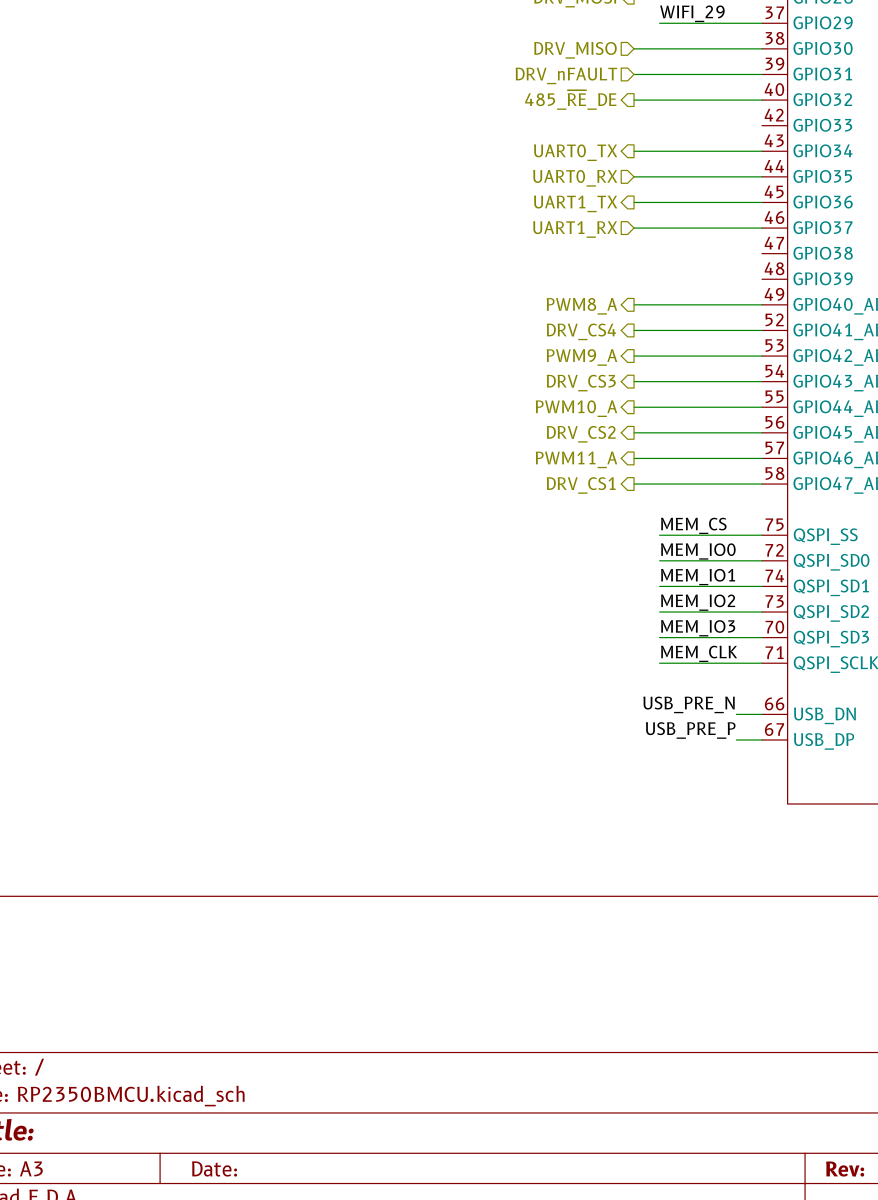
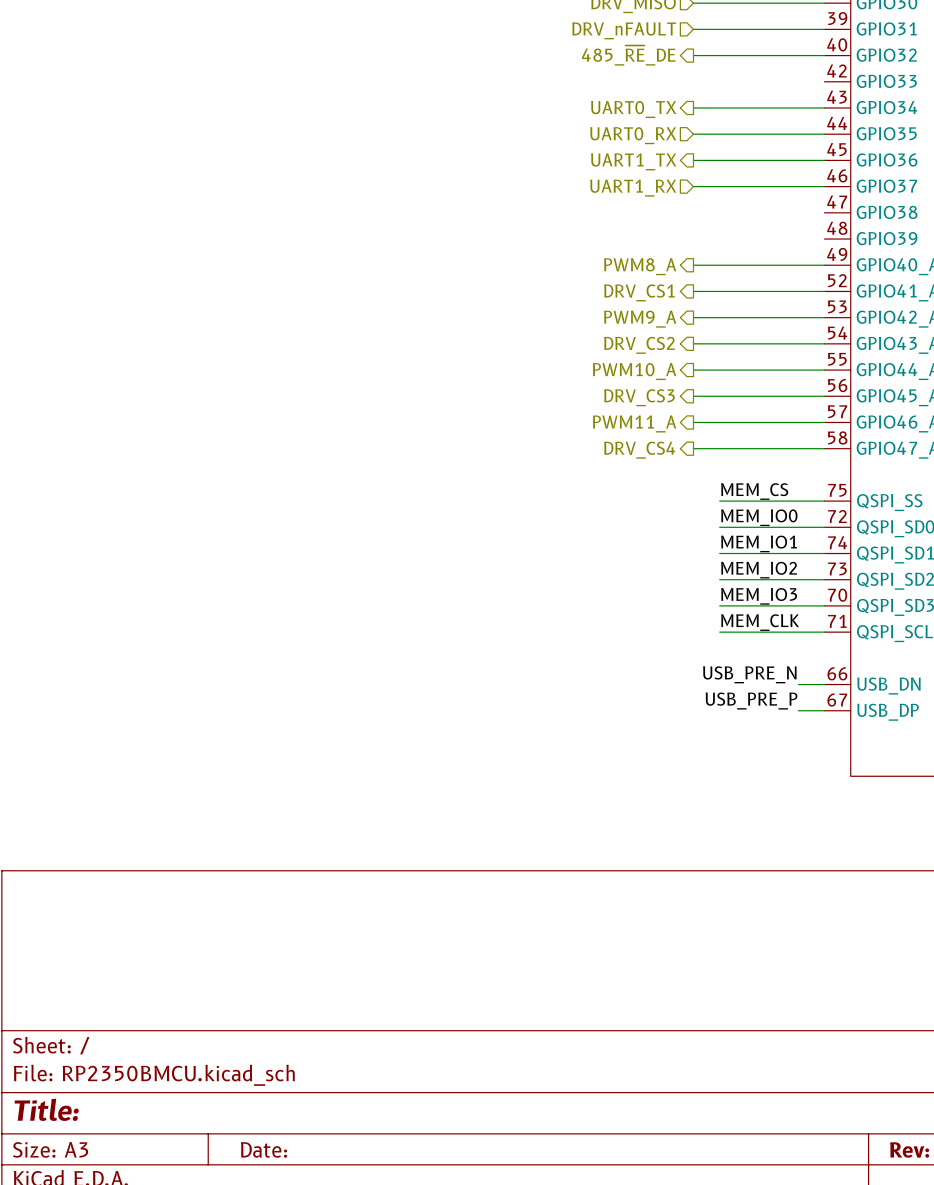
hierarchical label: DRV_CS4 (581, 331) -> DRV_CS1 (639, 292)
hierarchical label: DRV_CS3 (581, 383) -> DRV_CS2 (639, 345)
hierarchical label: DRV_CS2 (581, 434) -> DRV_CS3 (639, 397)
hierarchical label: DRV_CS1 (581, 485) -> DRV_CS4 (639, 450)

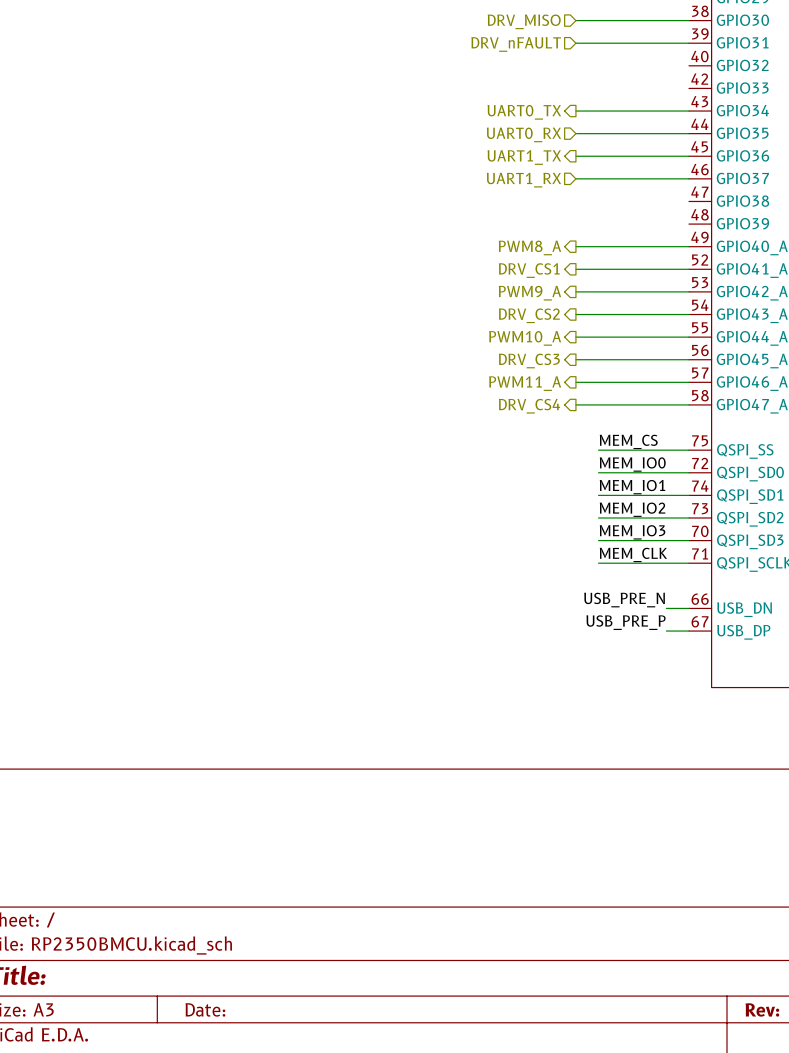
hierarchical label: 485_~{RE}_DE (628, 55) -> none
wire: (693, 55) (824, 55) -> none

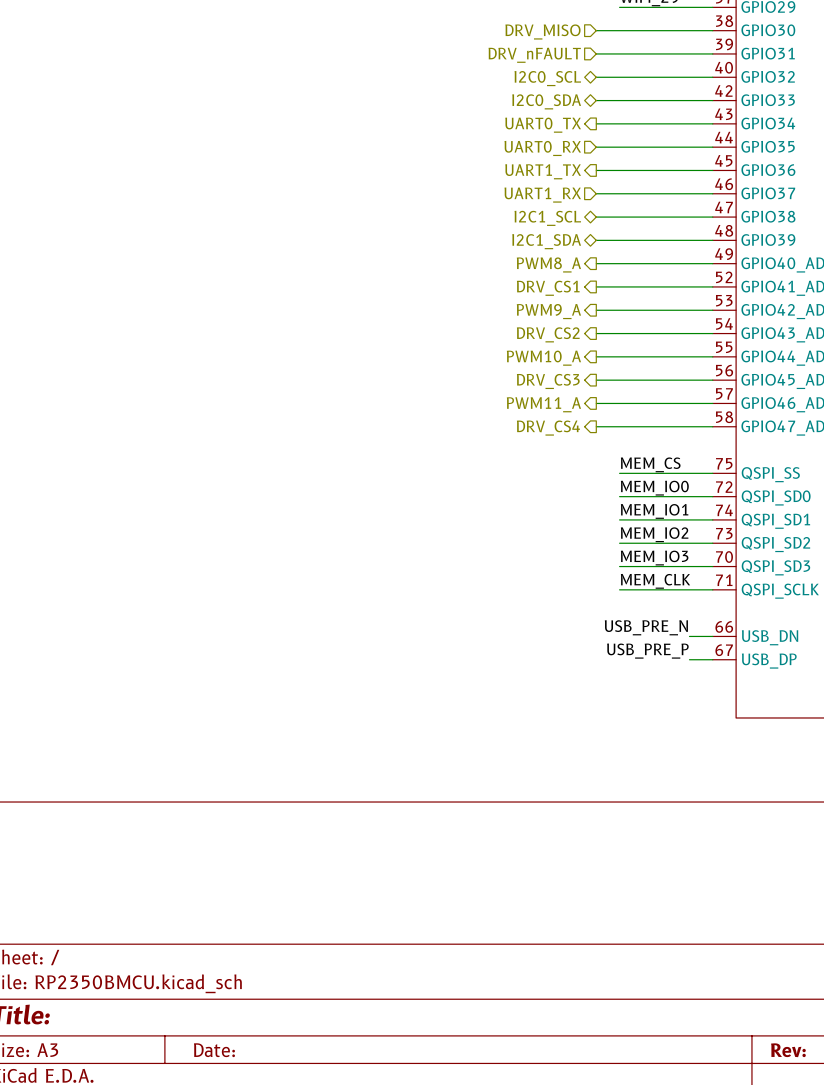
wire: none -> (596, 77) (712, 77)
hierarchical label: none -> I2C0_SCL (547, 78)
wire: none -> (596, 100) (712, 100)
hierarchical label: none -> I2C0_SDA (546, 101)
wire: none -> (596, 217) (712, 217)
hierarchical label: none -> I2C1_SCL (547, 218)
wire: none -> (596, 240) (712, 240)
hierarchical label: none -> I2C1_SDA (546, 241)

